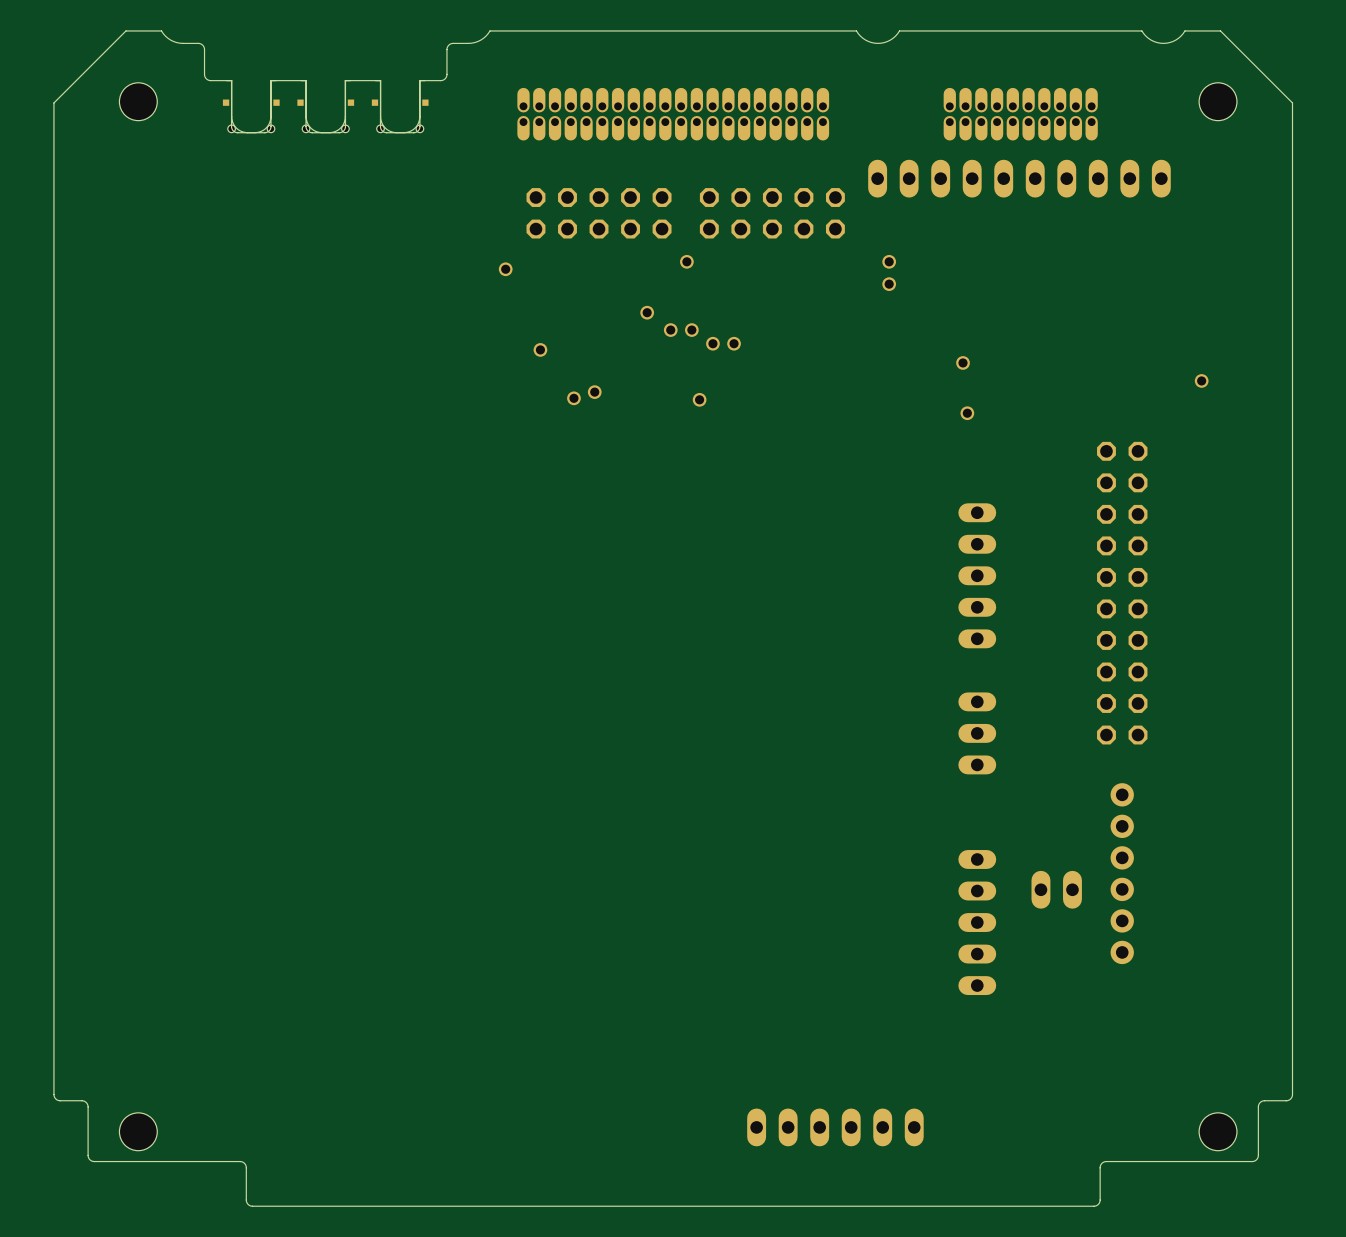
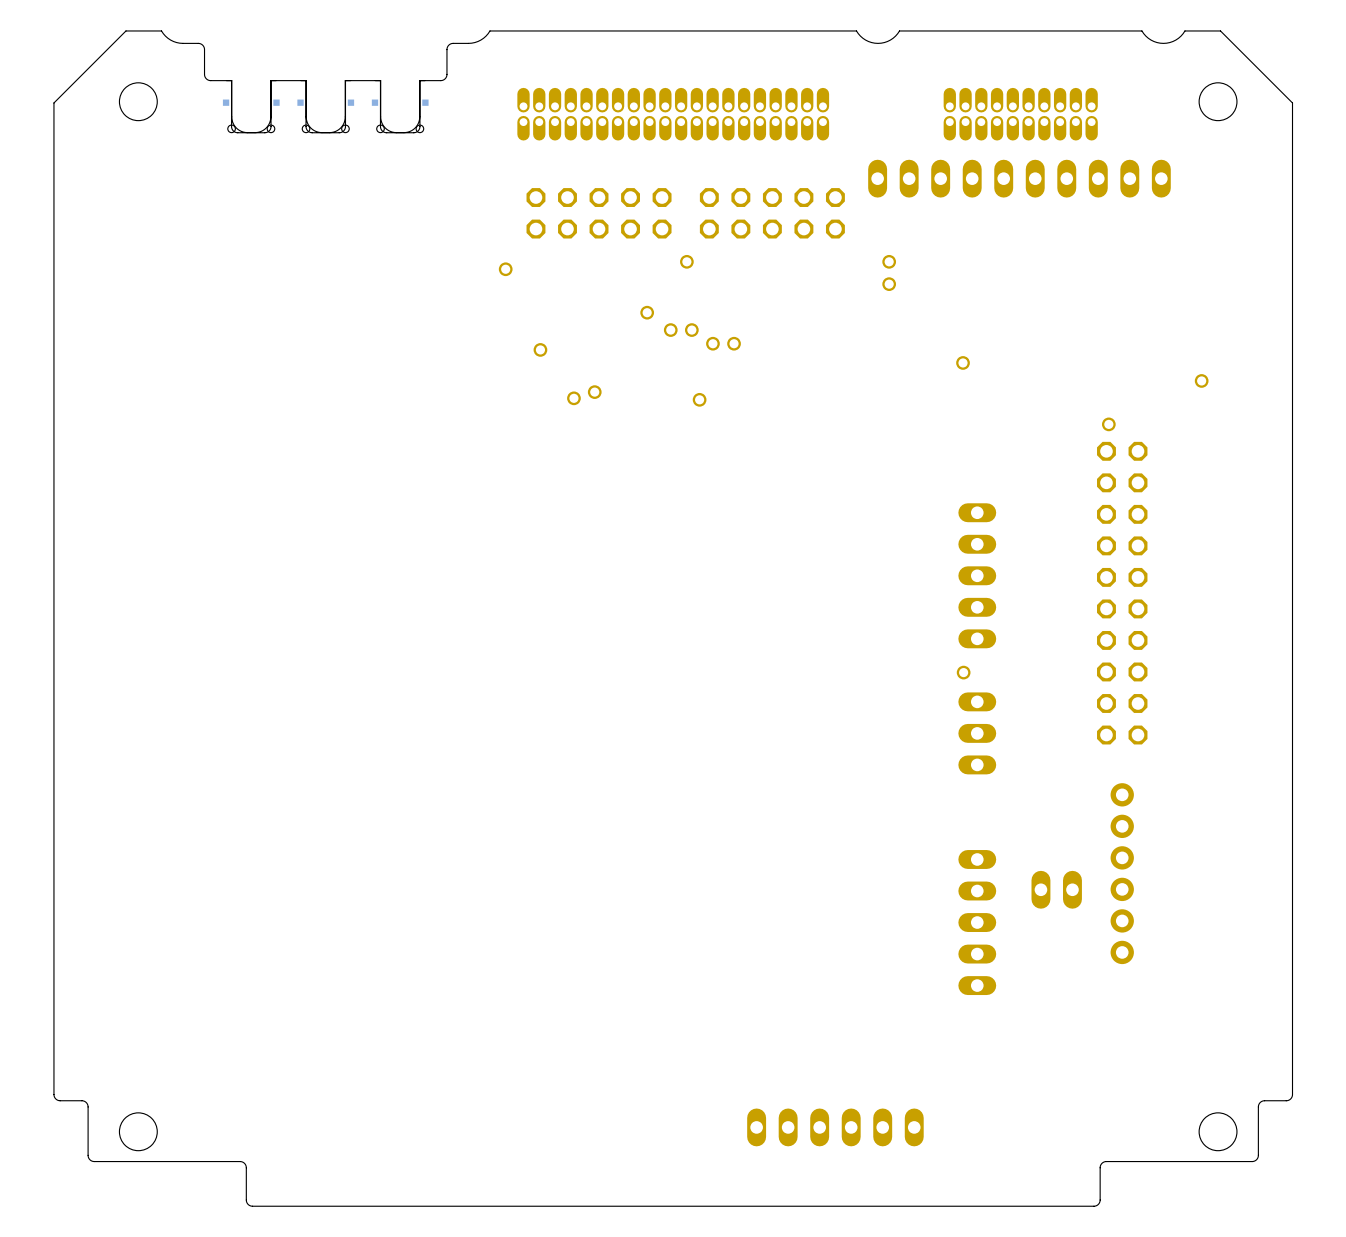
part: (967, 413) -> none
part: none -> (1108, 424)
part: none -> (963, 672)

